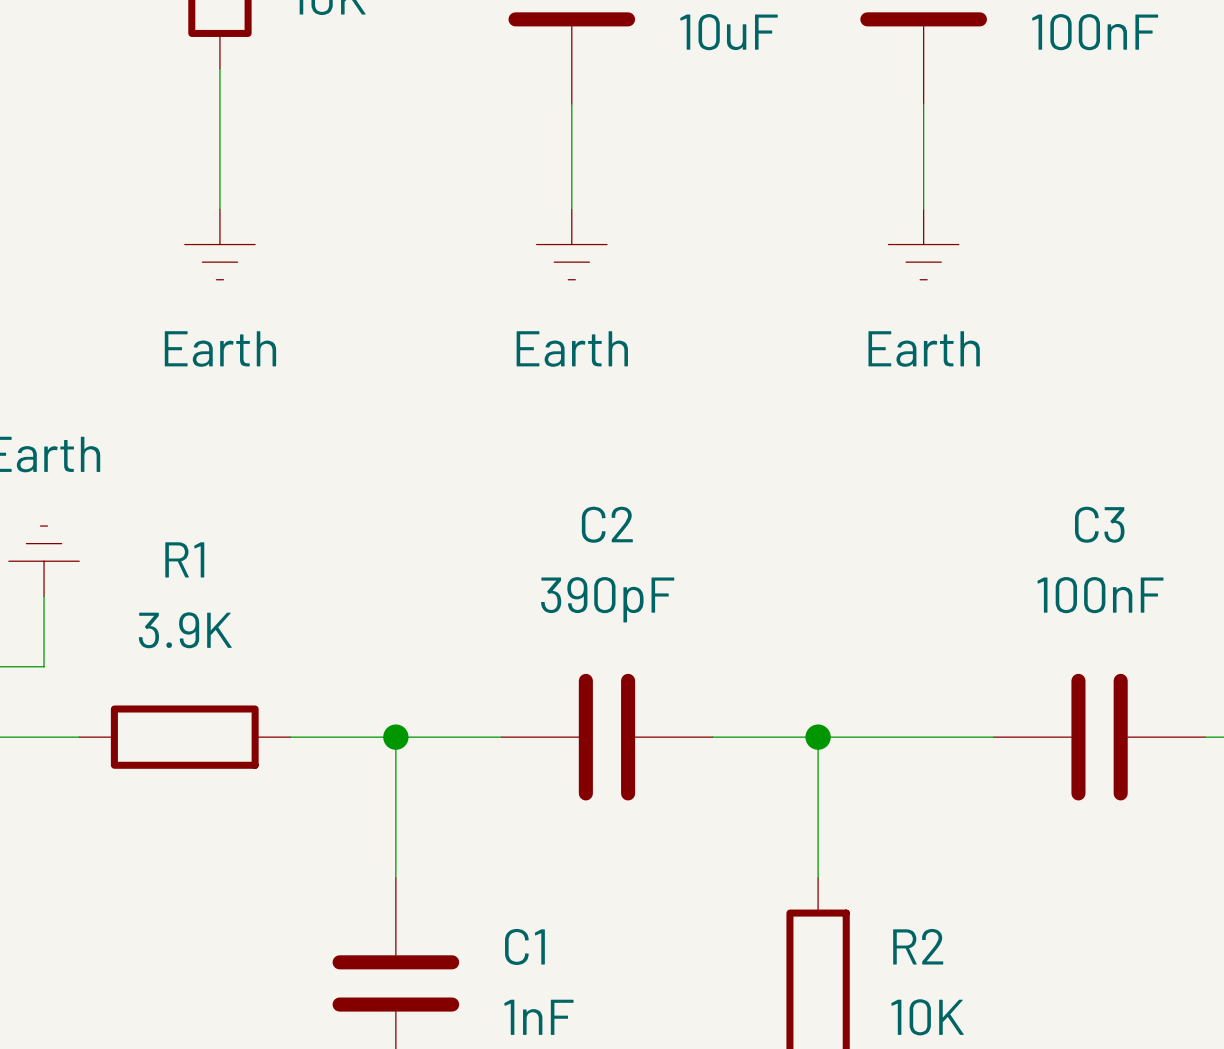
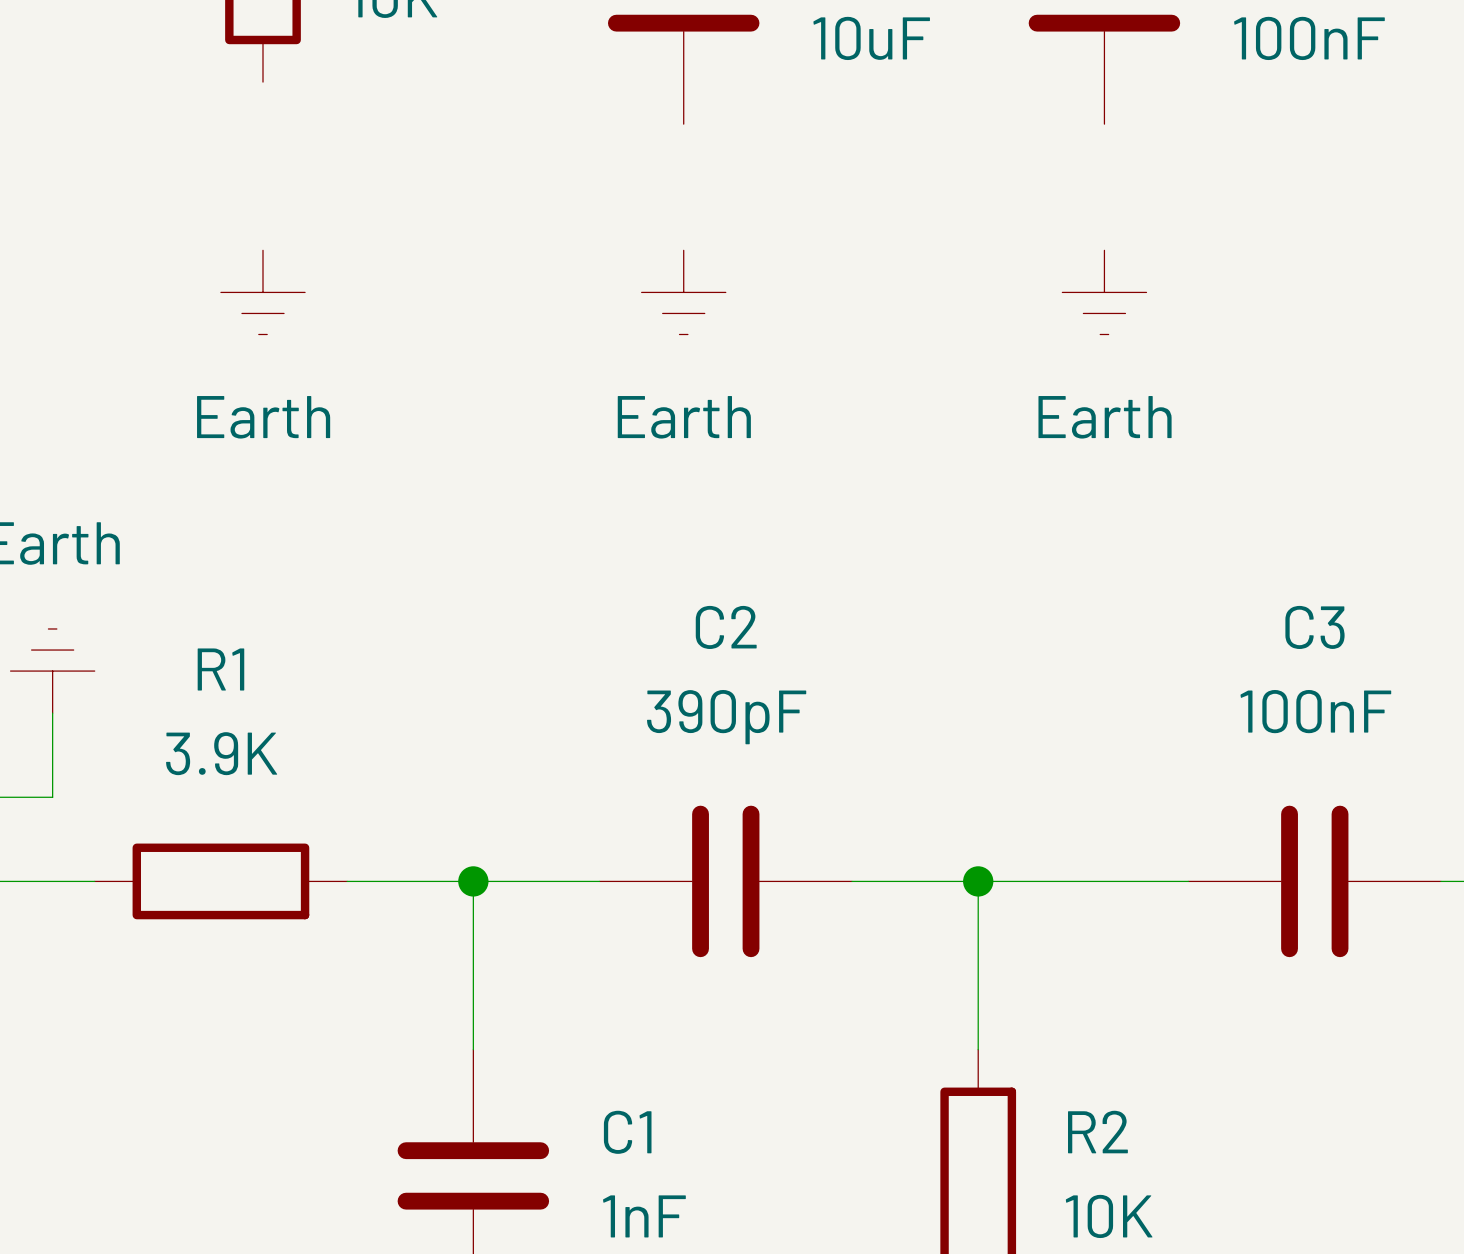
wire: (219, 68) (219, 209) -> none
wire: (571, 103) (571, 209) -> none
wire: (923, 103) (923, 209) -> none

